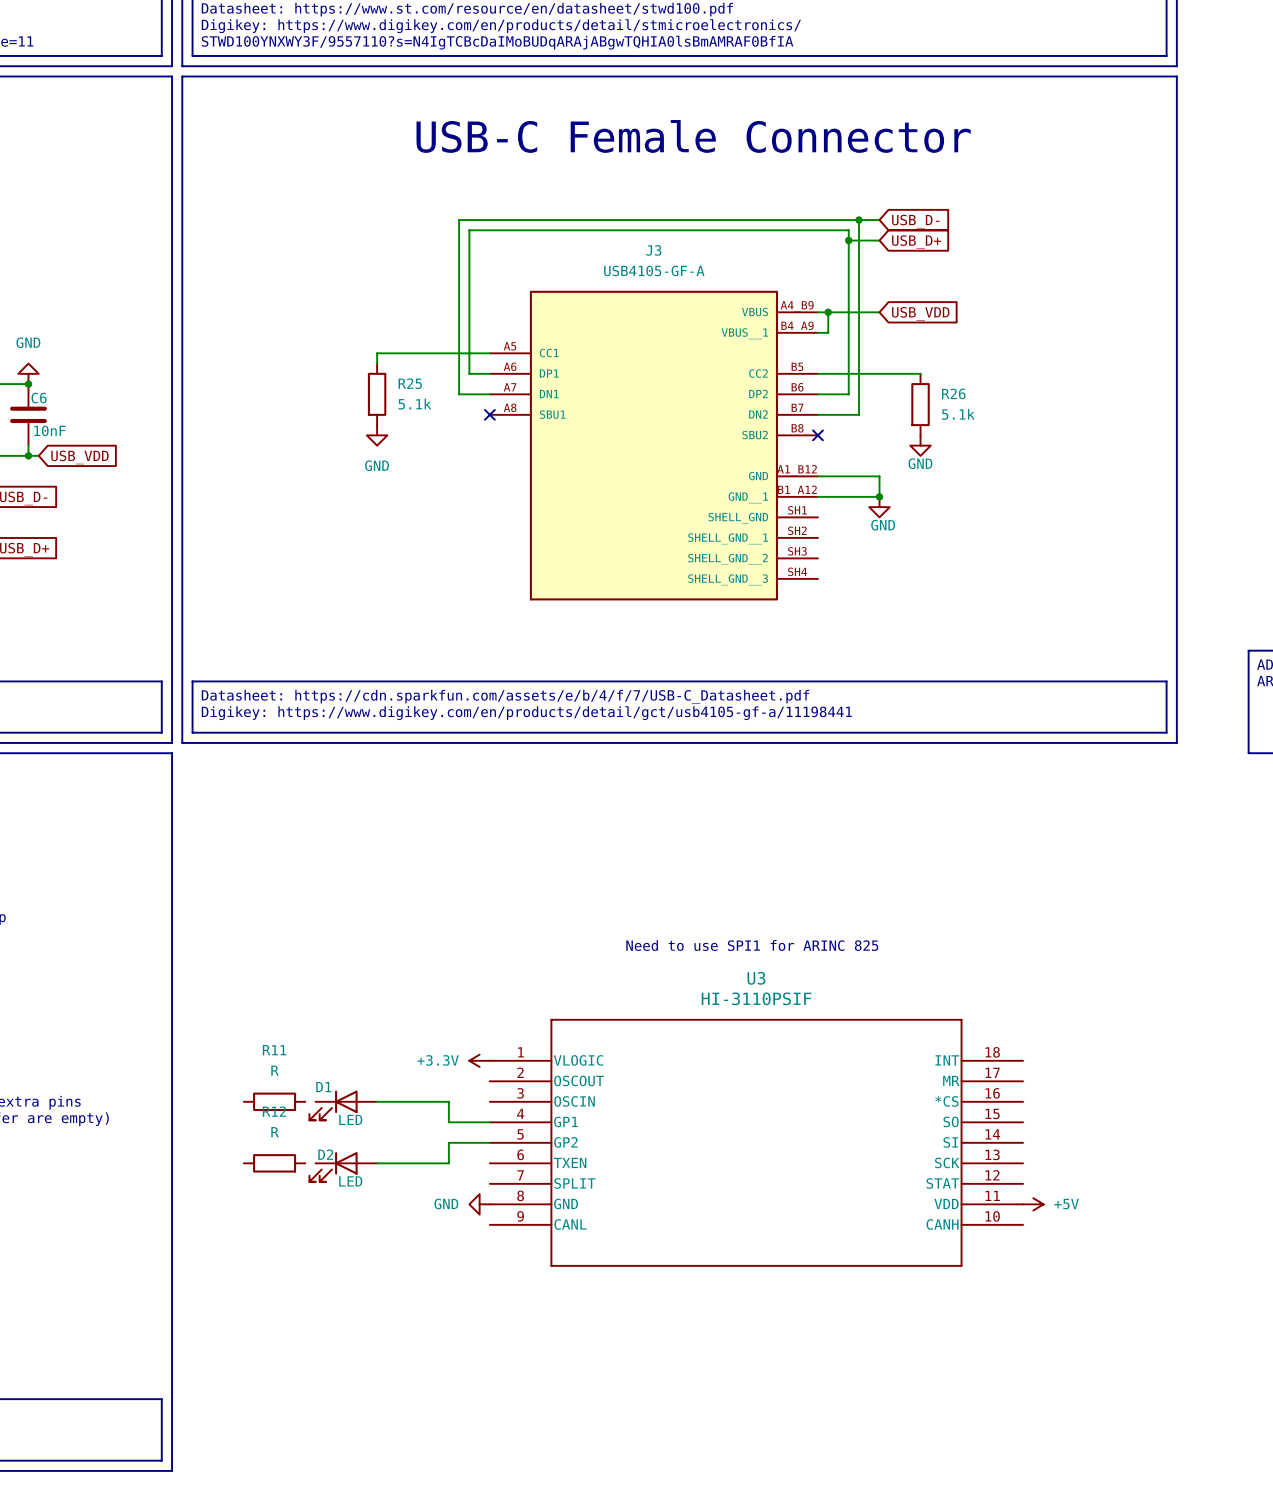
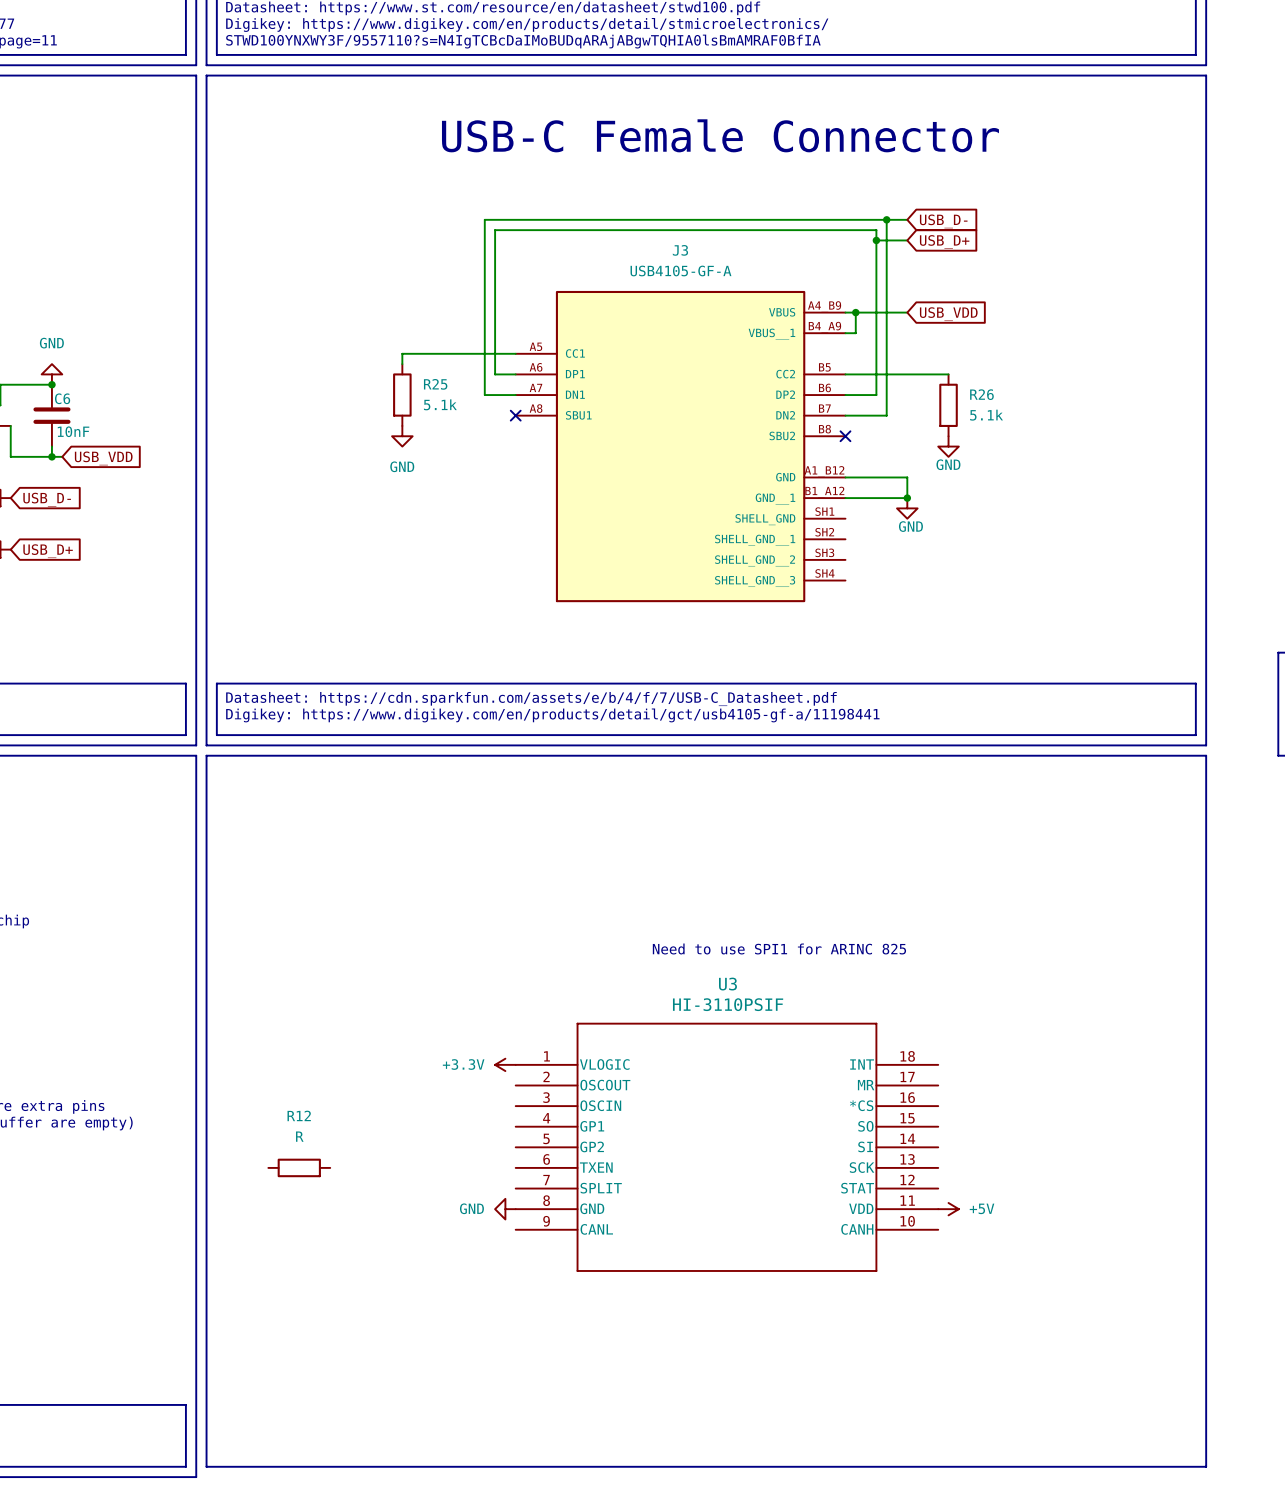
line: none -> (206, 755) (1206, 755) (1206, 1466) (206, 1466) (206, 755)
U3 symbol: [489, 1019, 1024, 1267] -> [515, 1023, 939, 1272]
R11: R (274, 1101) -> none
wire: (377, 1101) (448, 1101) (448, 1122) (489, 1122) -> none
D1: LED (343, 1105) -> none
wire: (489, 1142) (448, 1142) (448, 1163) (377, 1163) -> none
D2: LED (343, 1166) -> none
power symbol position: +5V (1033, 1204) -> +5V (948, 1209)

